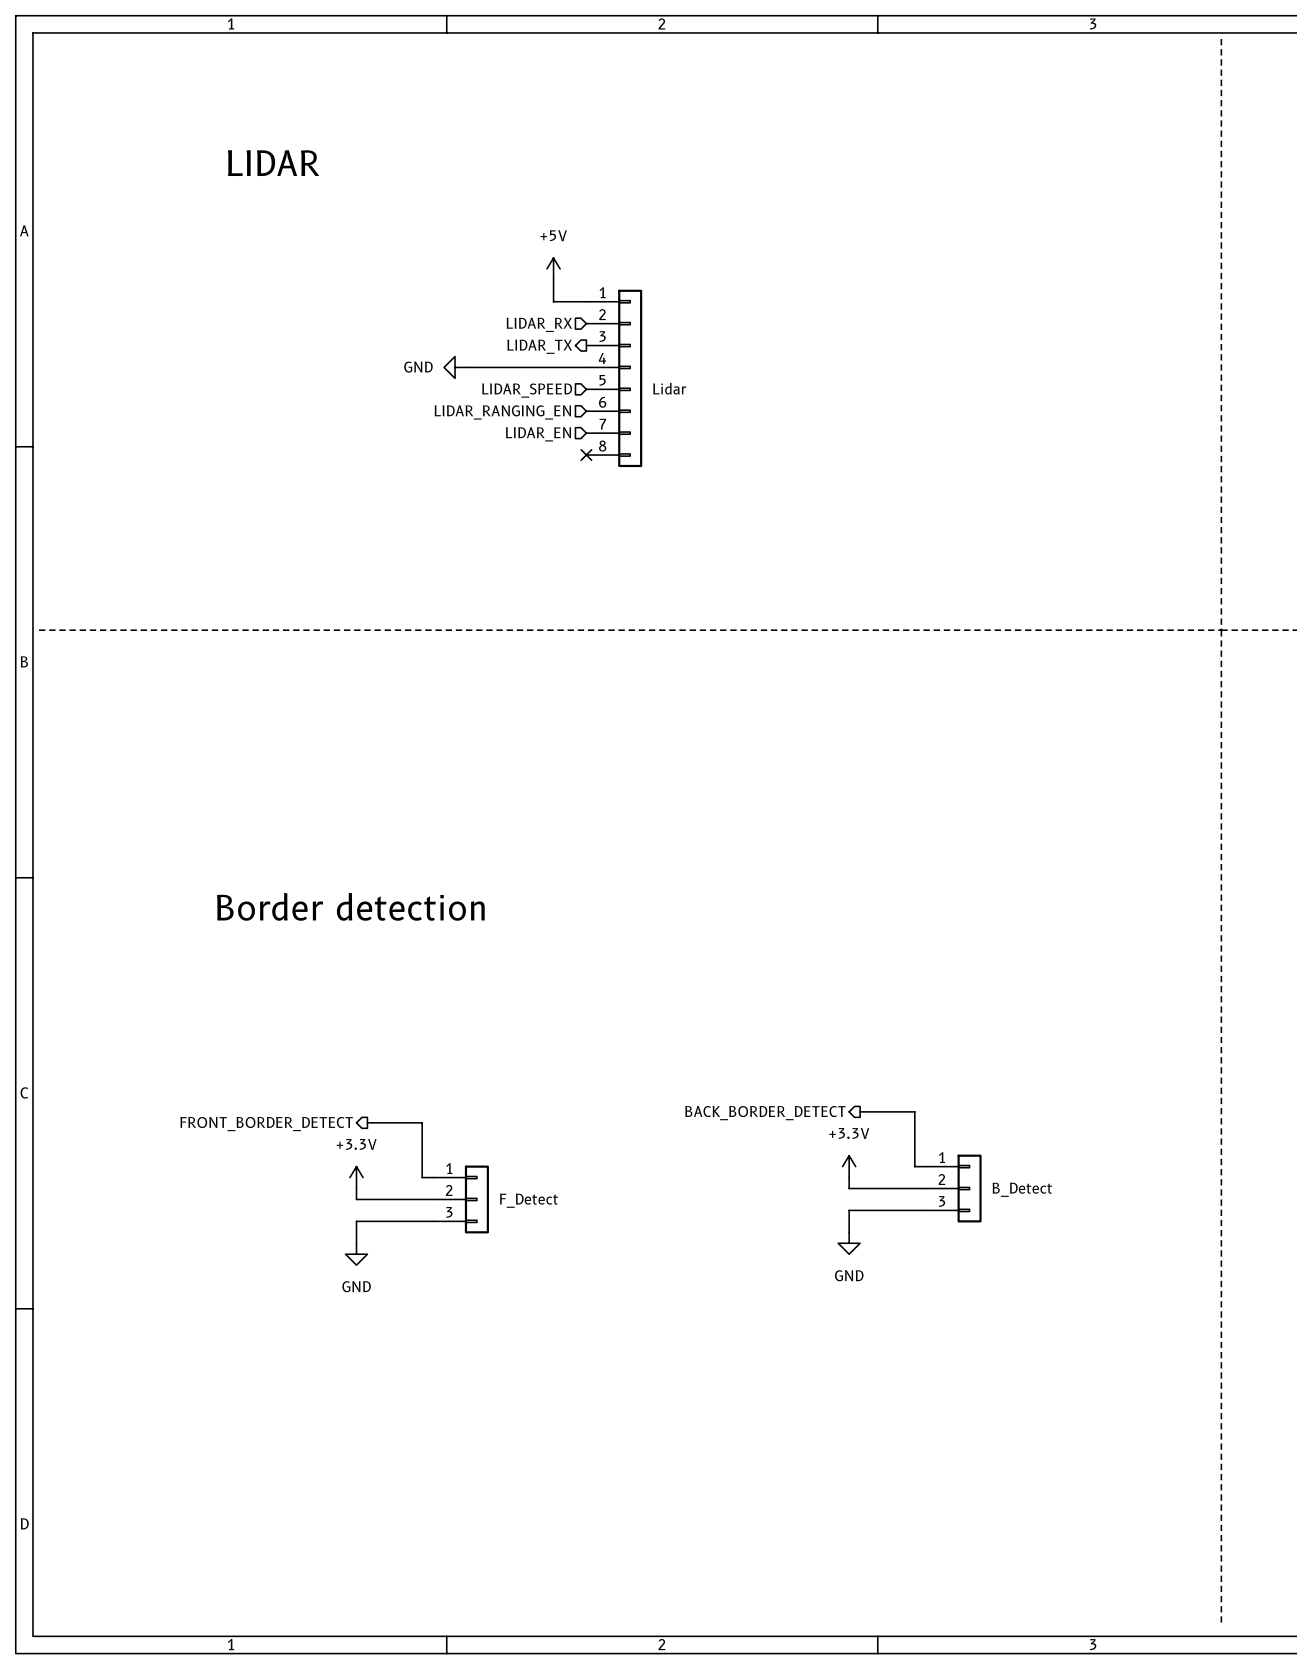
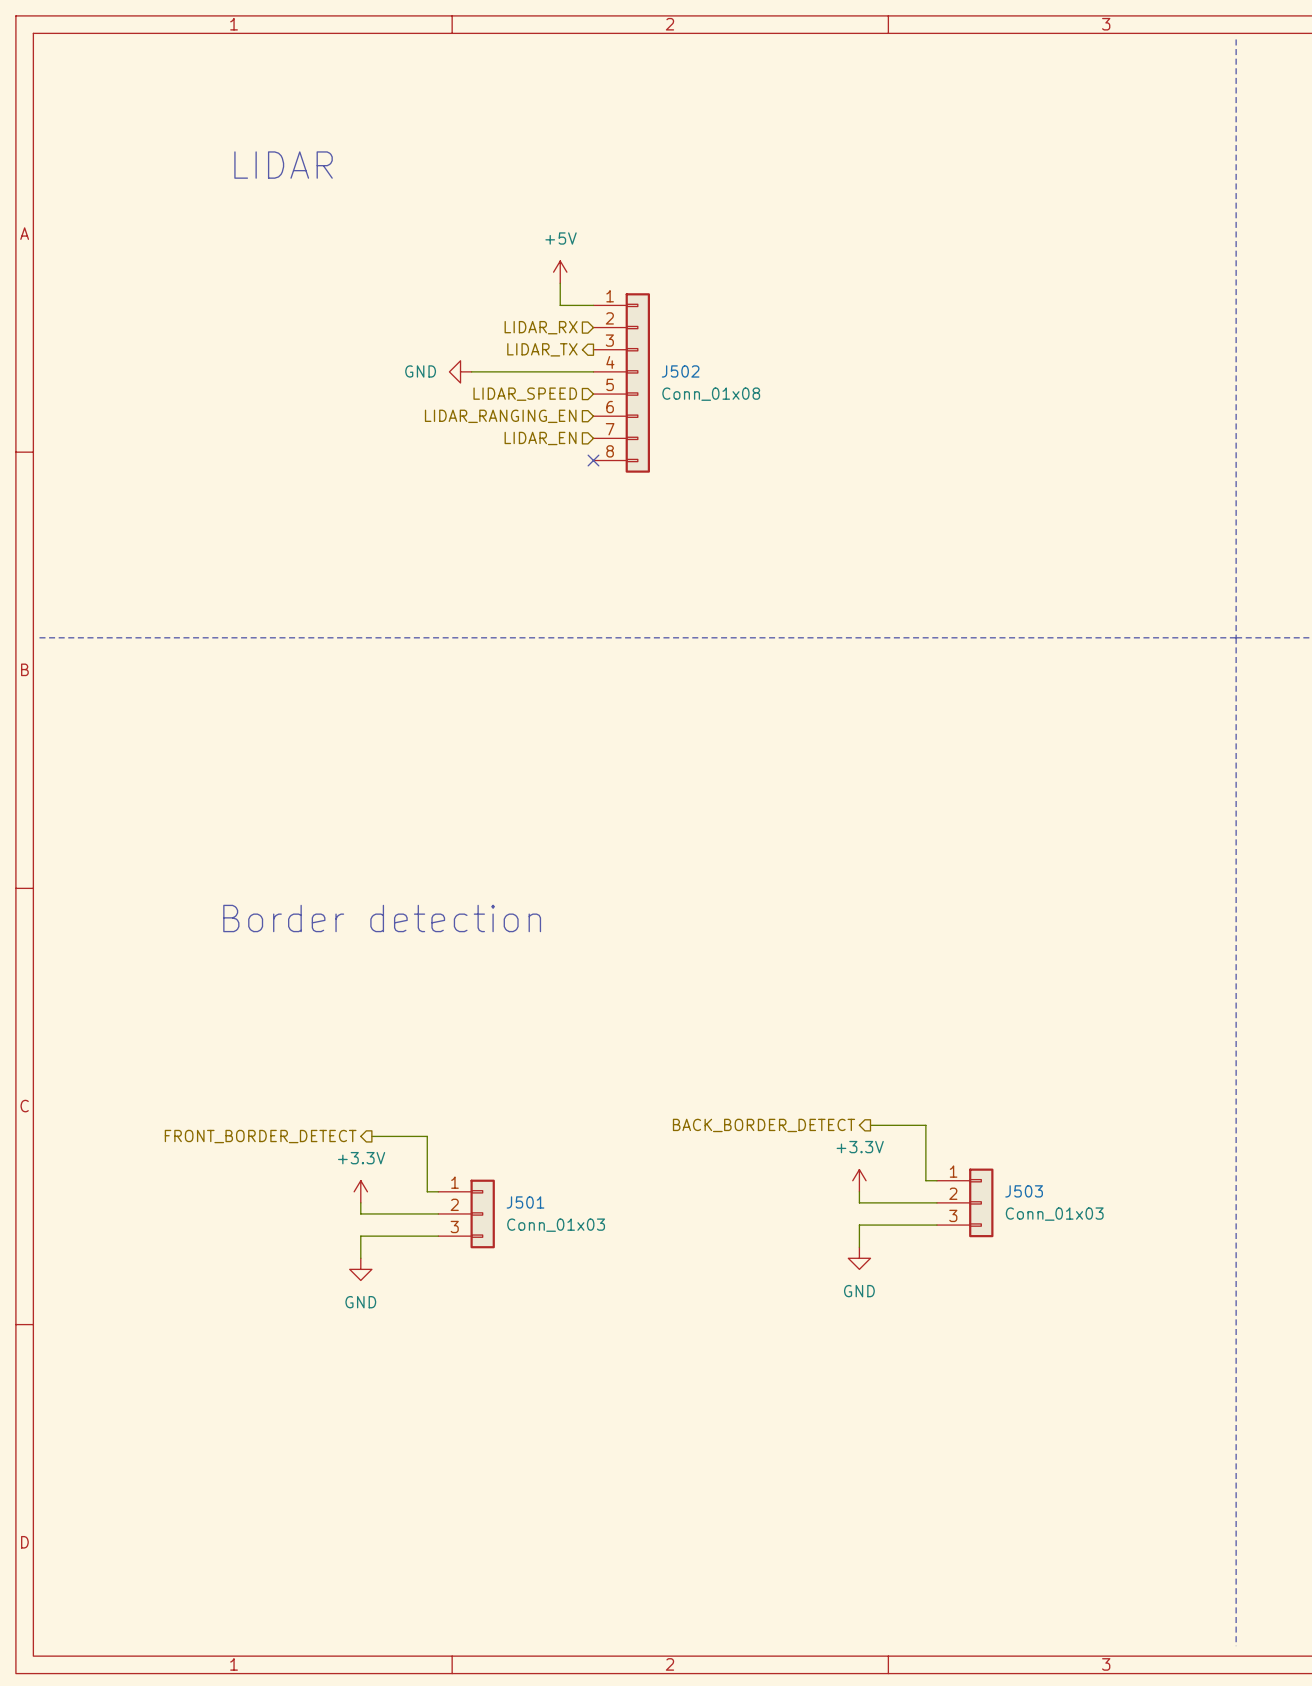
J502 name: none -> J502 (680, 371)
J502 value: Lidar (669, 388) -> Conn_01x08 (711, 394)
J503 name: none -> J503 (1024, 1191)
J501 name: none -> J501 (525, 1202)
J503 value: B_Detect (1022, 1189) -> Conn_01x03 (1054, 1214)
J501 value: F_Detect (529, 1200) -> Conn_01x03 (556, 1225)

